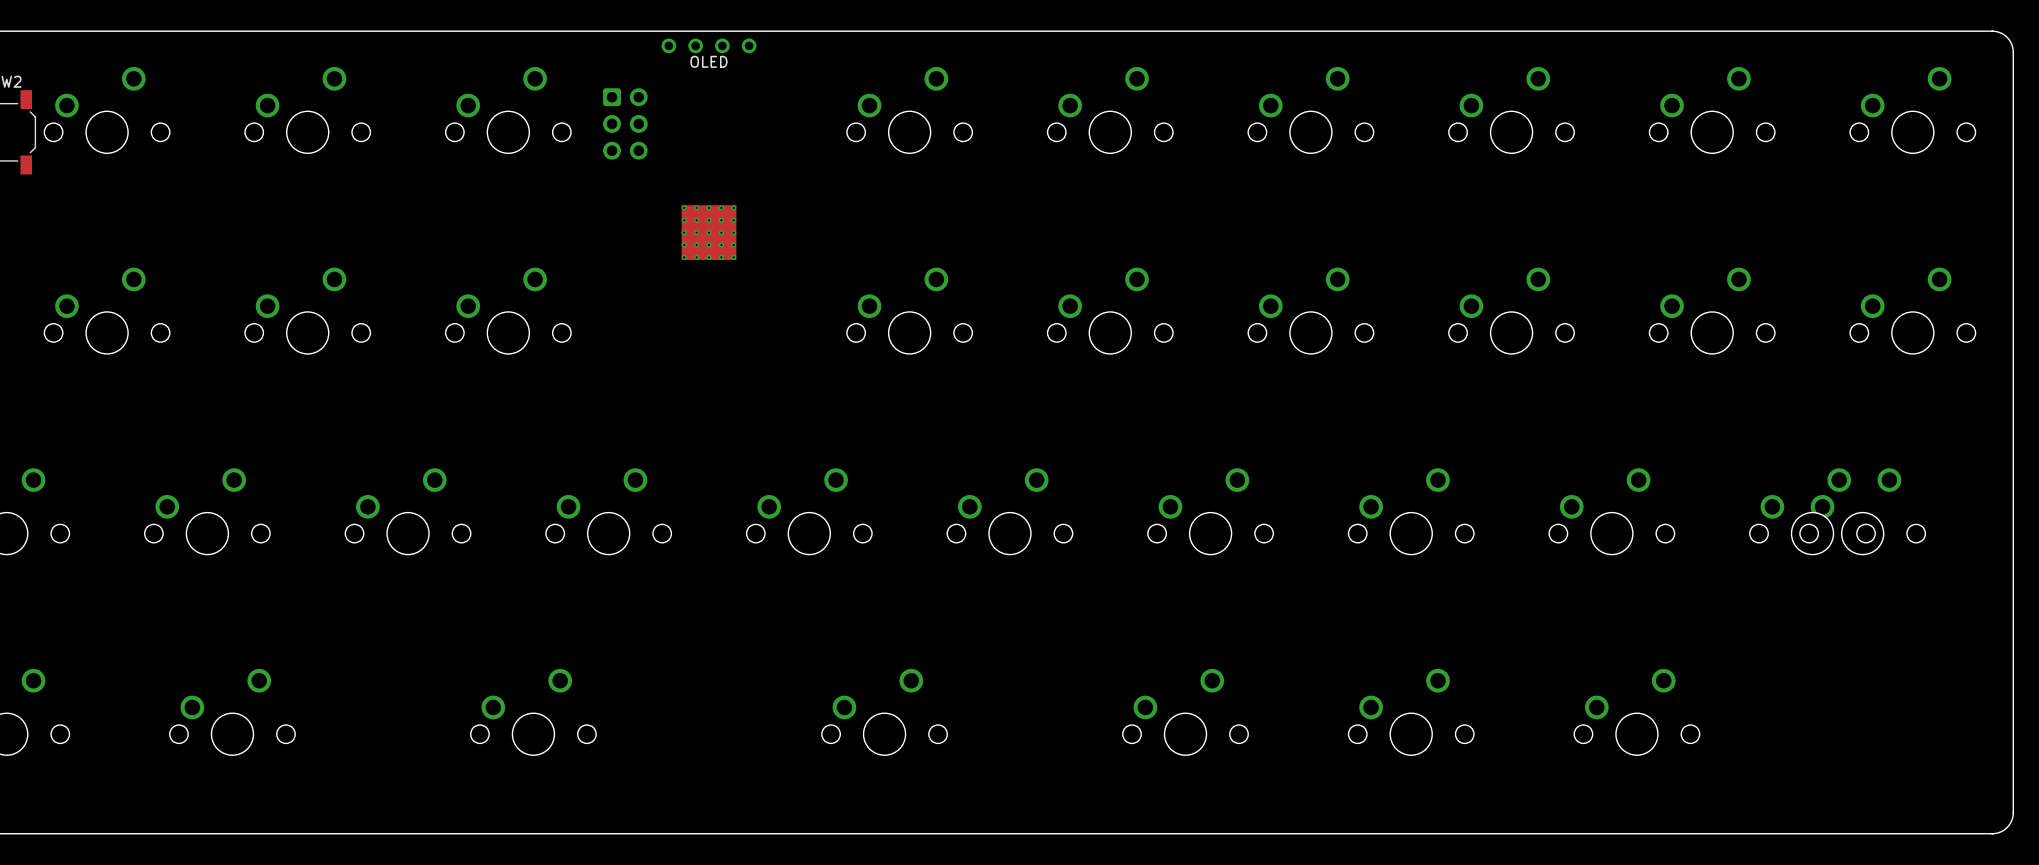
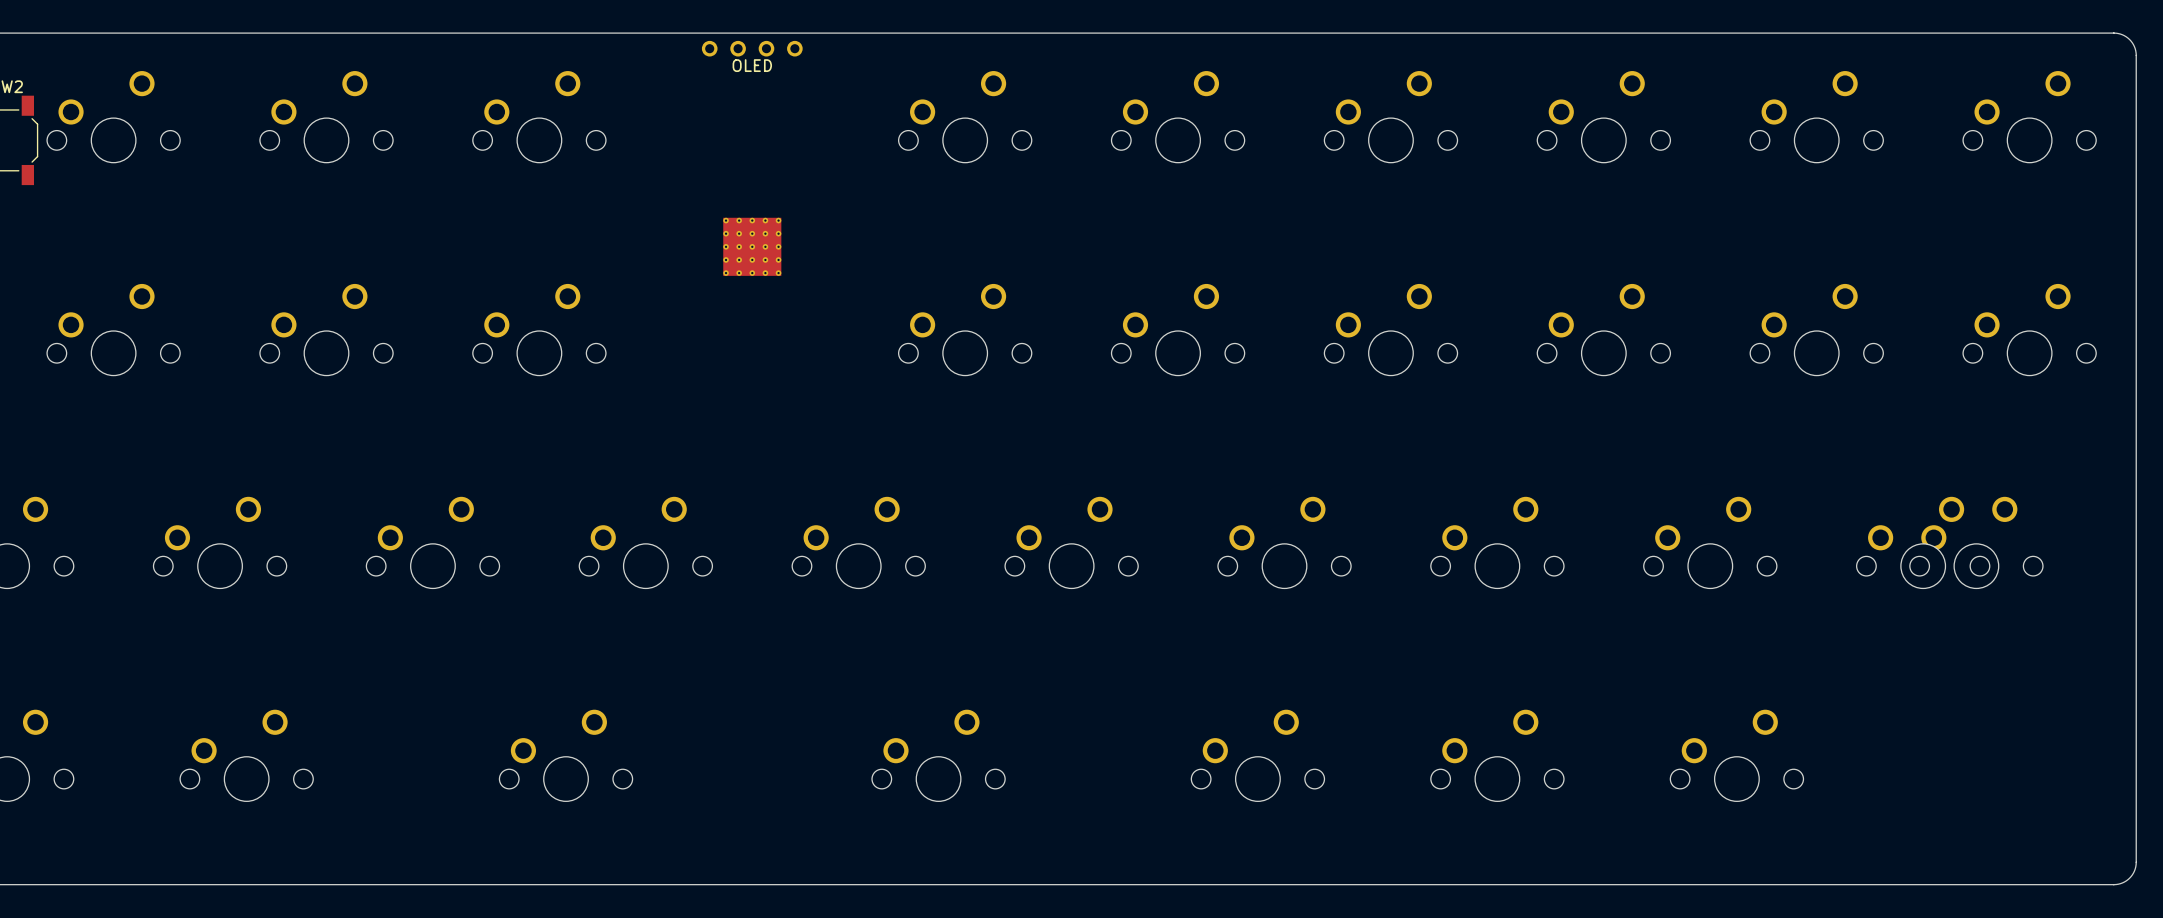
part: (625, 123) -> none

